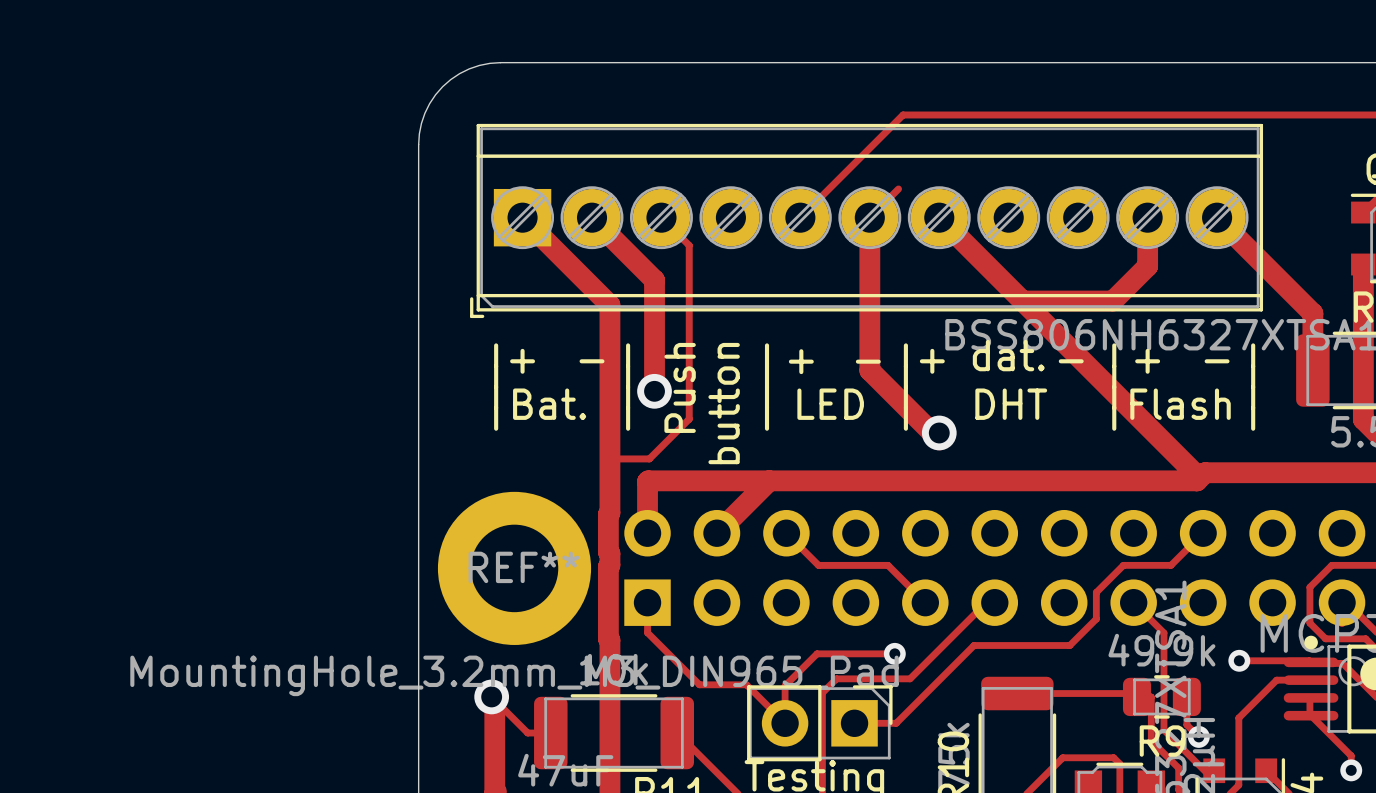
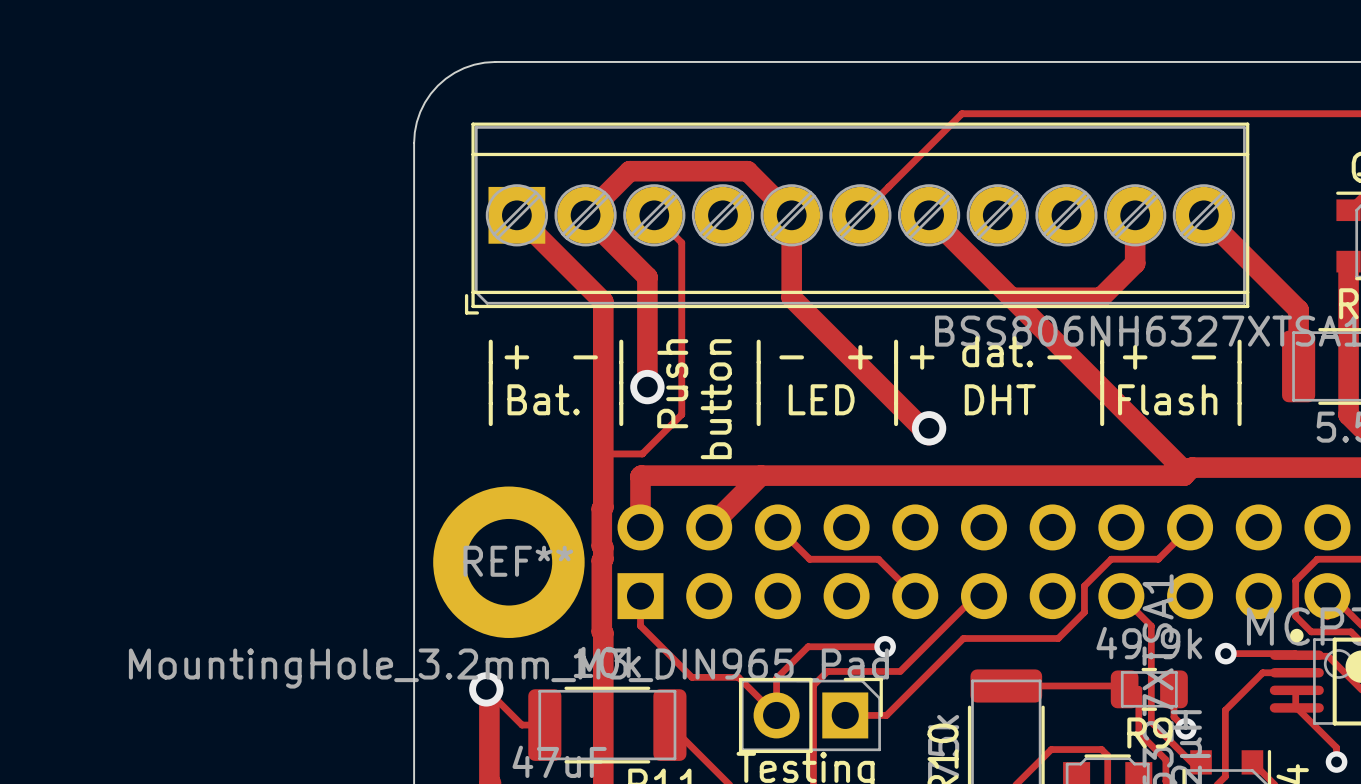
track: (972, 114) (903, 114) (800, 217) -> (961, 113) (888, 186)
track: (869, 217) (869, 370) -> (585, 215) (629, 171) (747, 171) (791, 215) (791, 297) (860, 366)
text: + (801, 361) -> - (791, 357)
text: - (868, 361) -> + (860, 357)

